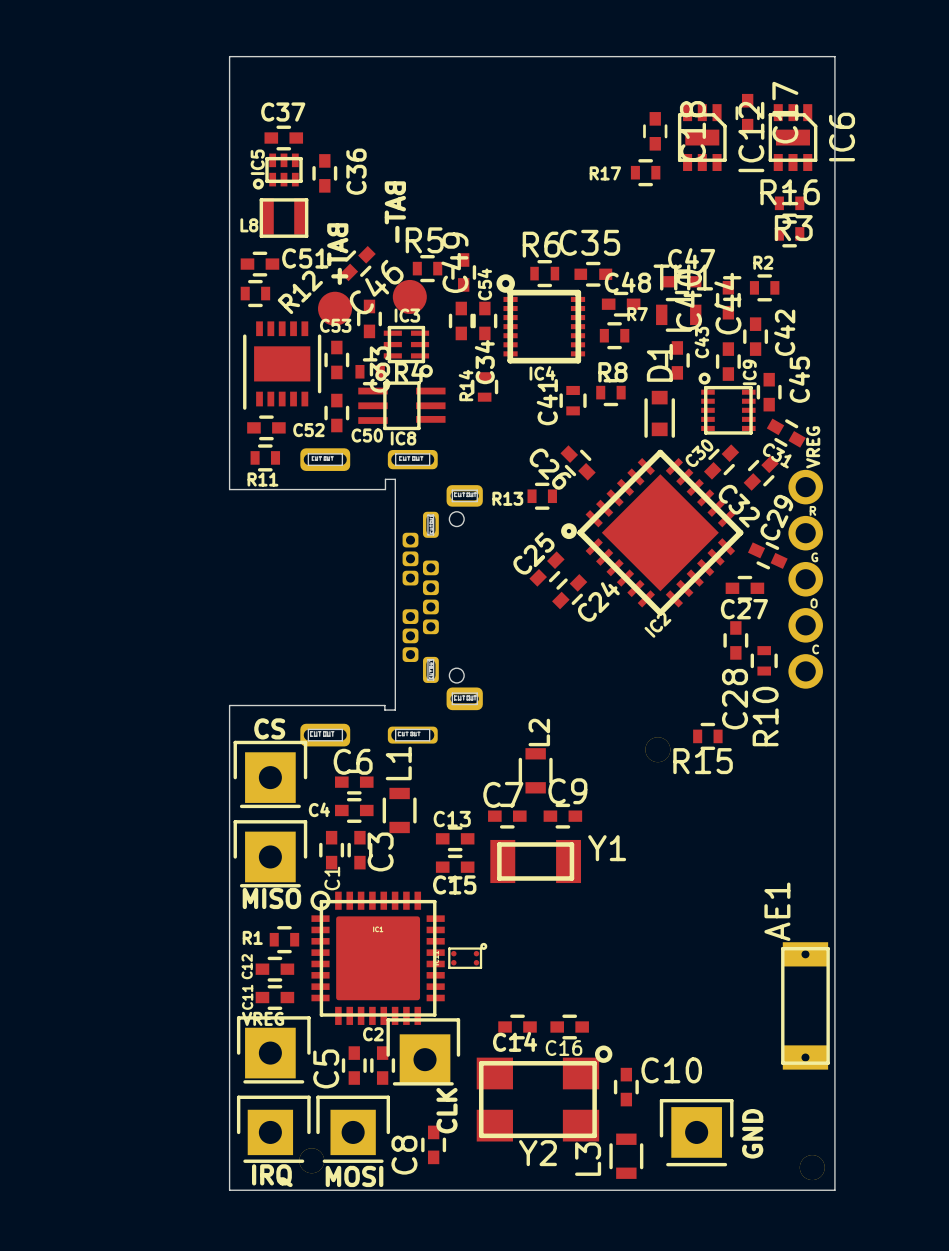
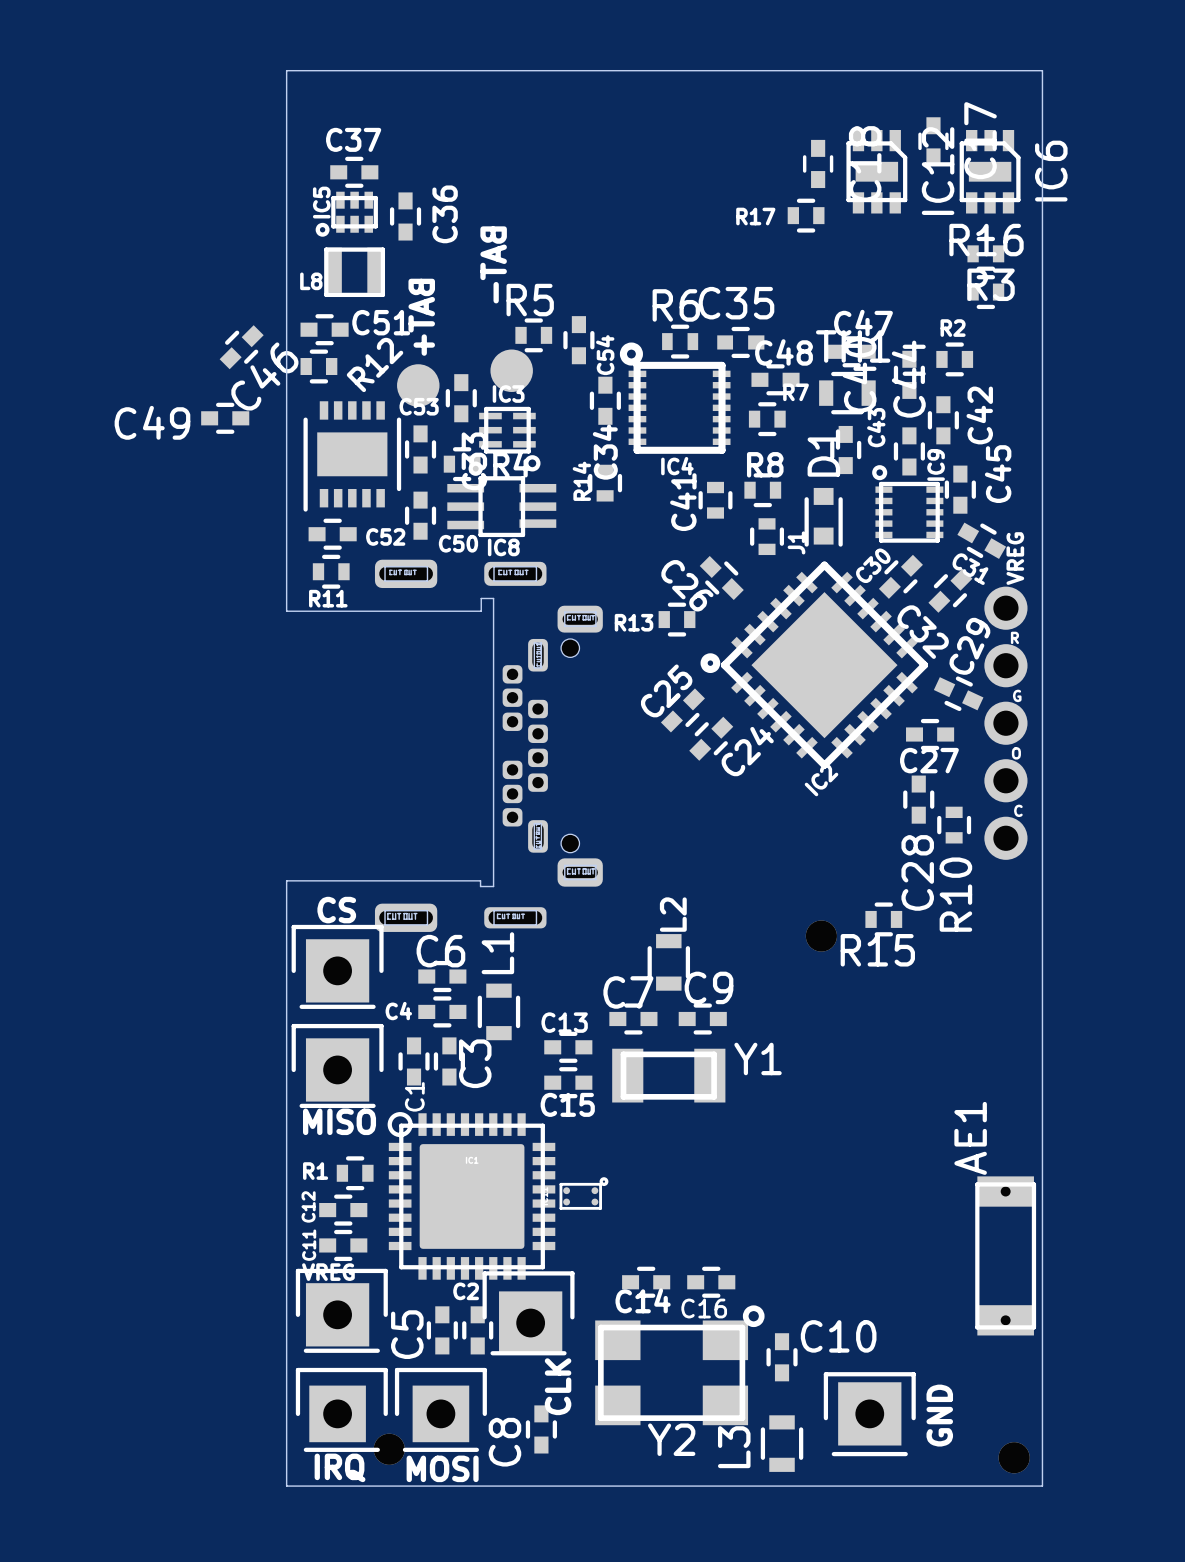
C49 name position: C49 (454, 262) -> C49 (152, 422)
C46 position: (358, 263) -> (241, 347)
C49 rotation: 0° (461, 320) -> 90° clockwise (225, 418)
C49 position: (461, 320) -> (225, 418)
J1: none -> (767, 536)

